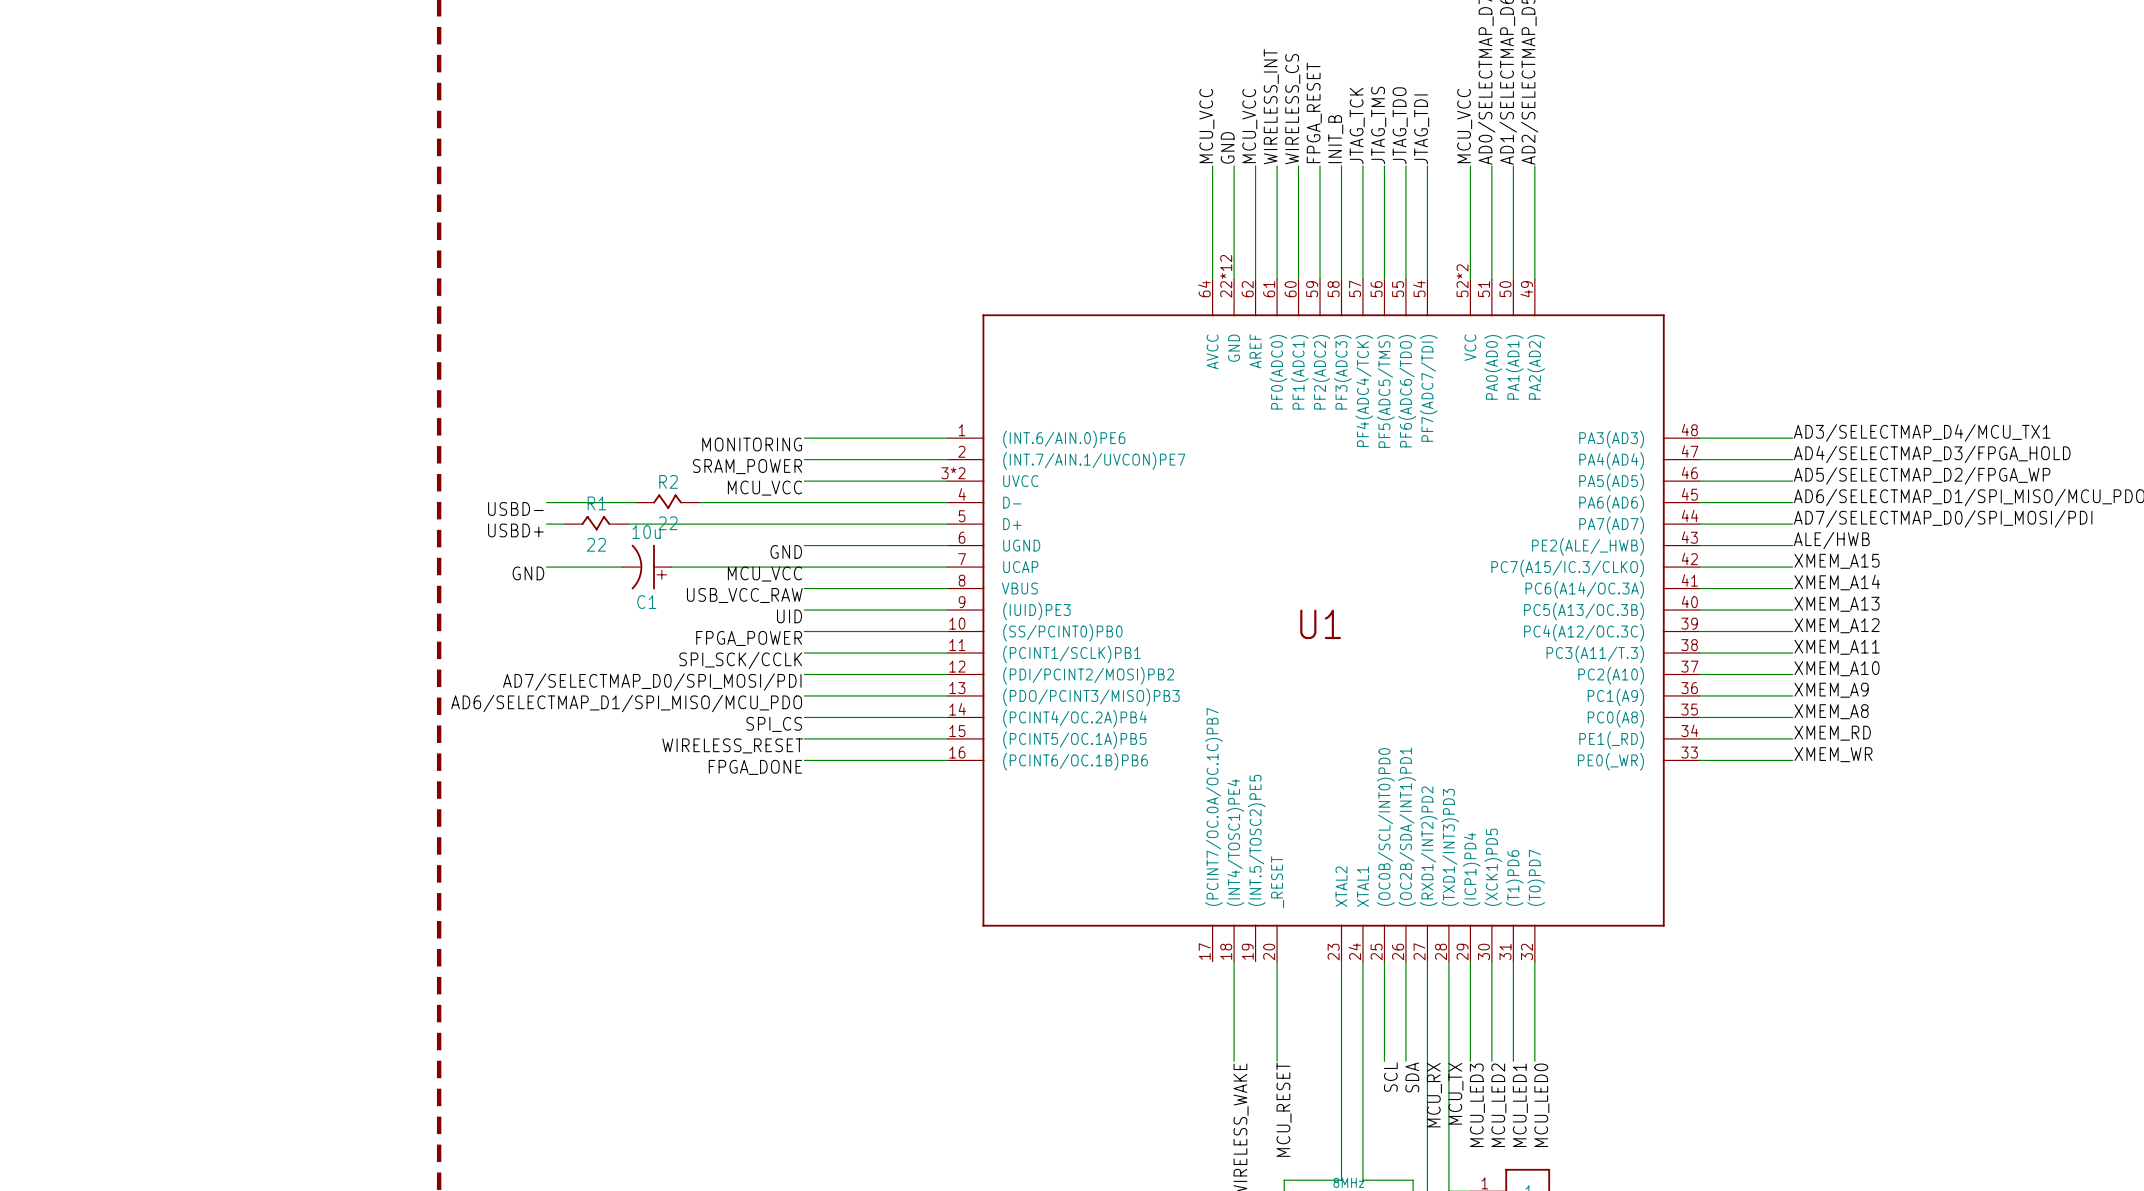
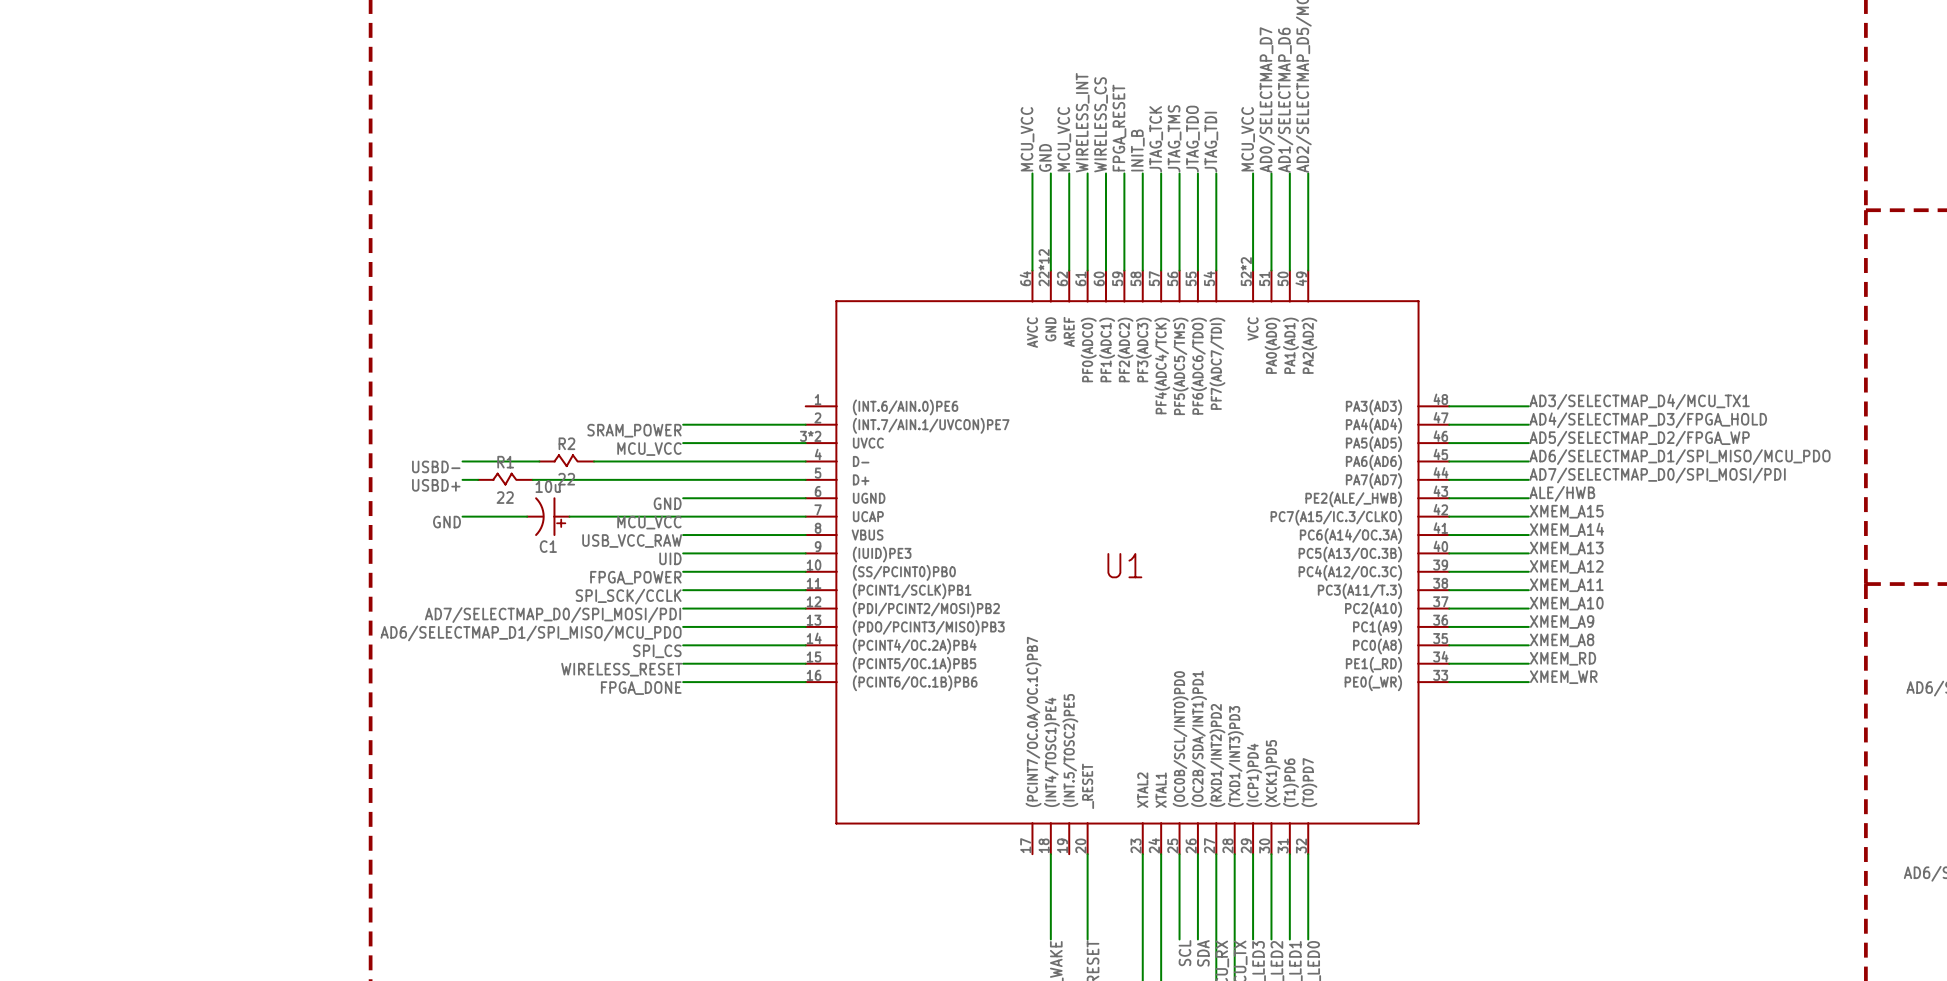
wire: (804, 438) (947, 438) -> none
label: MONITORING (752, 444) -> none

